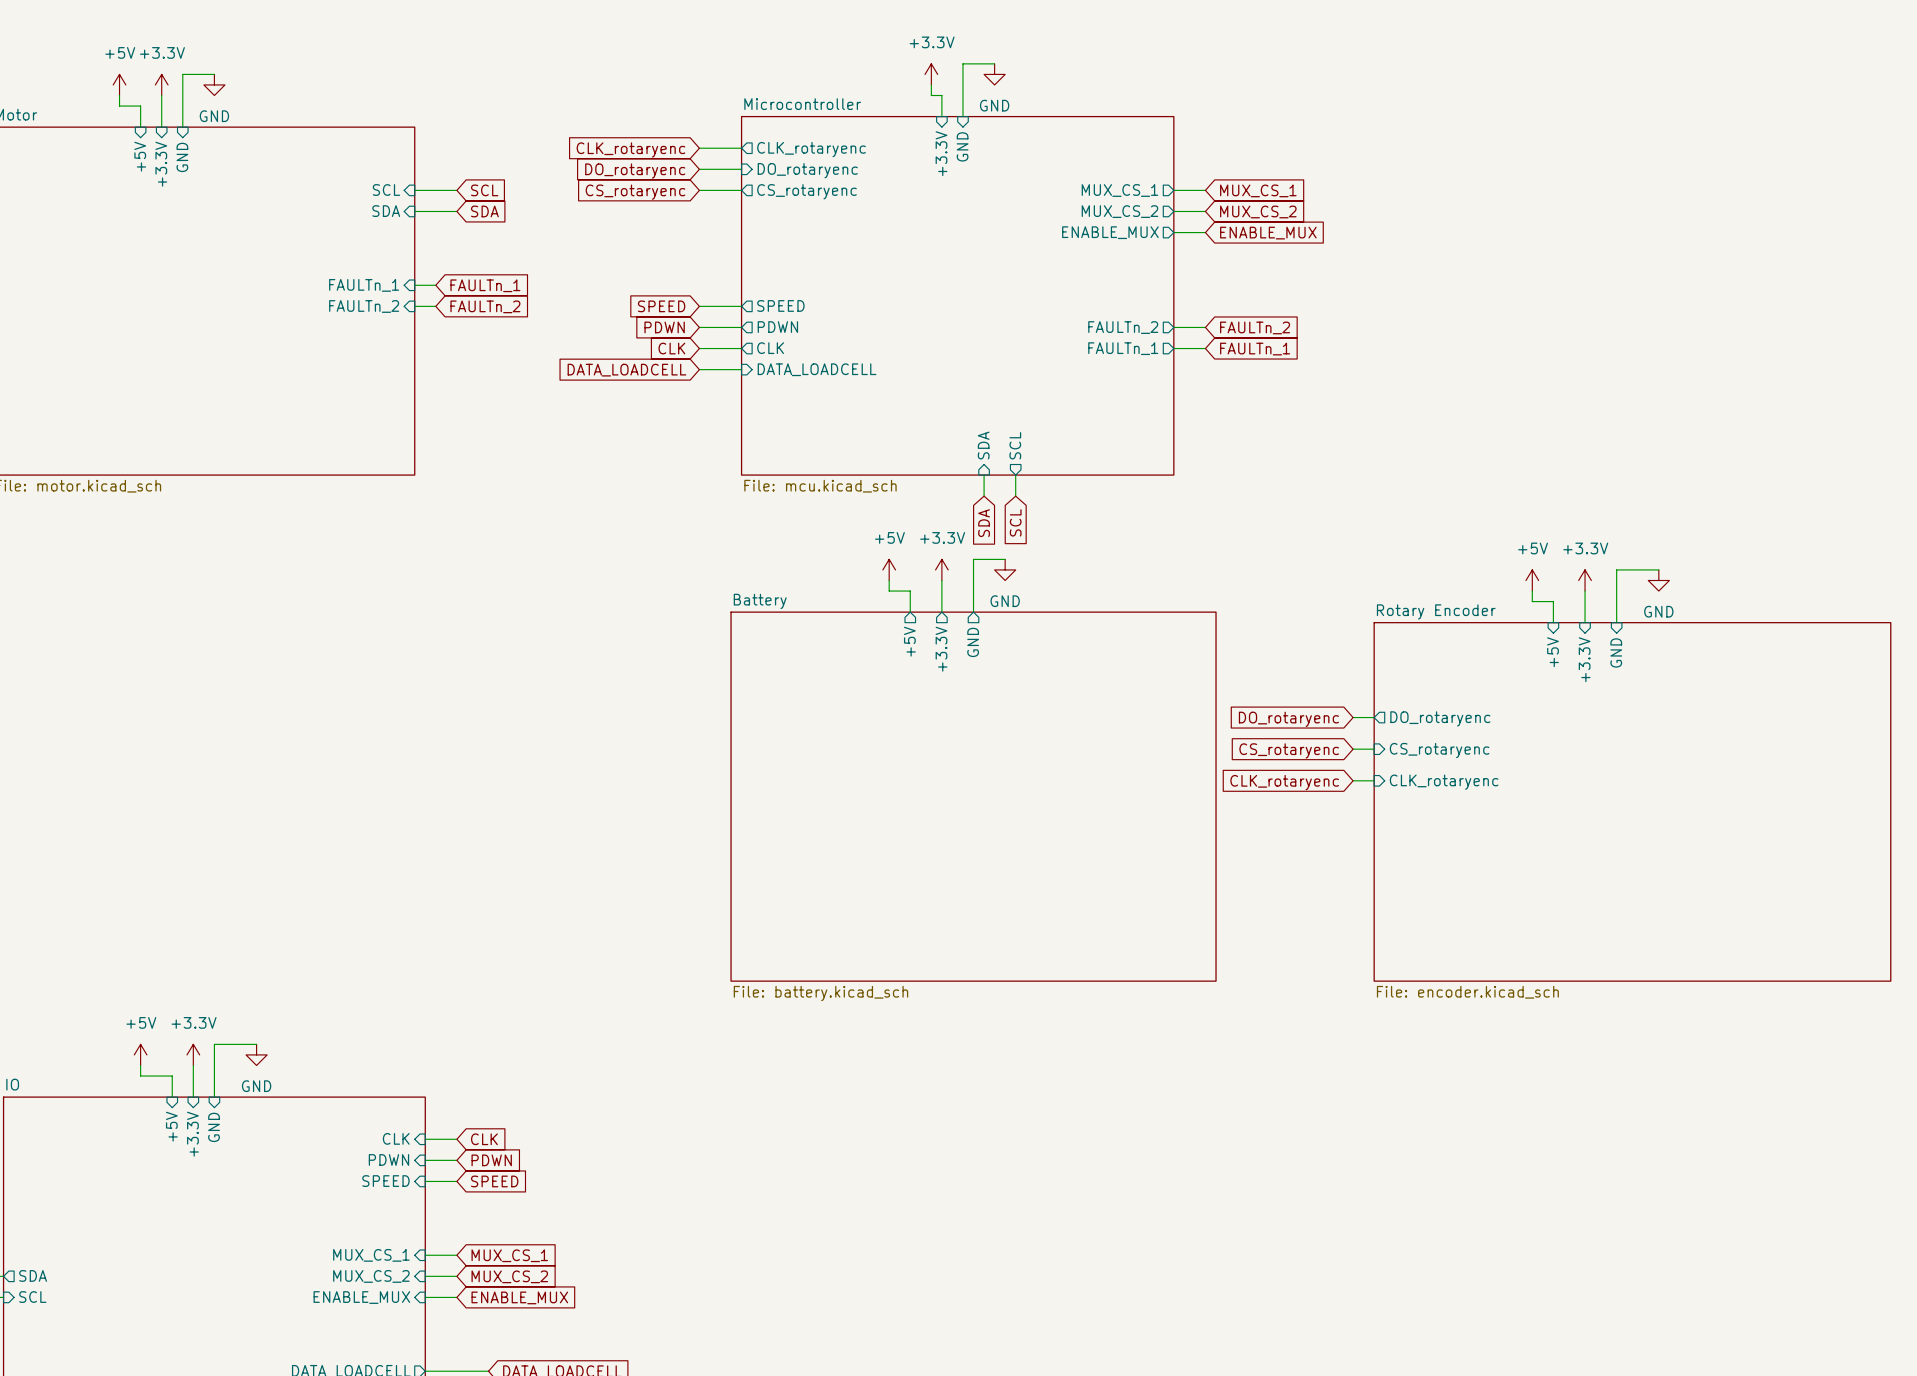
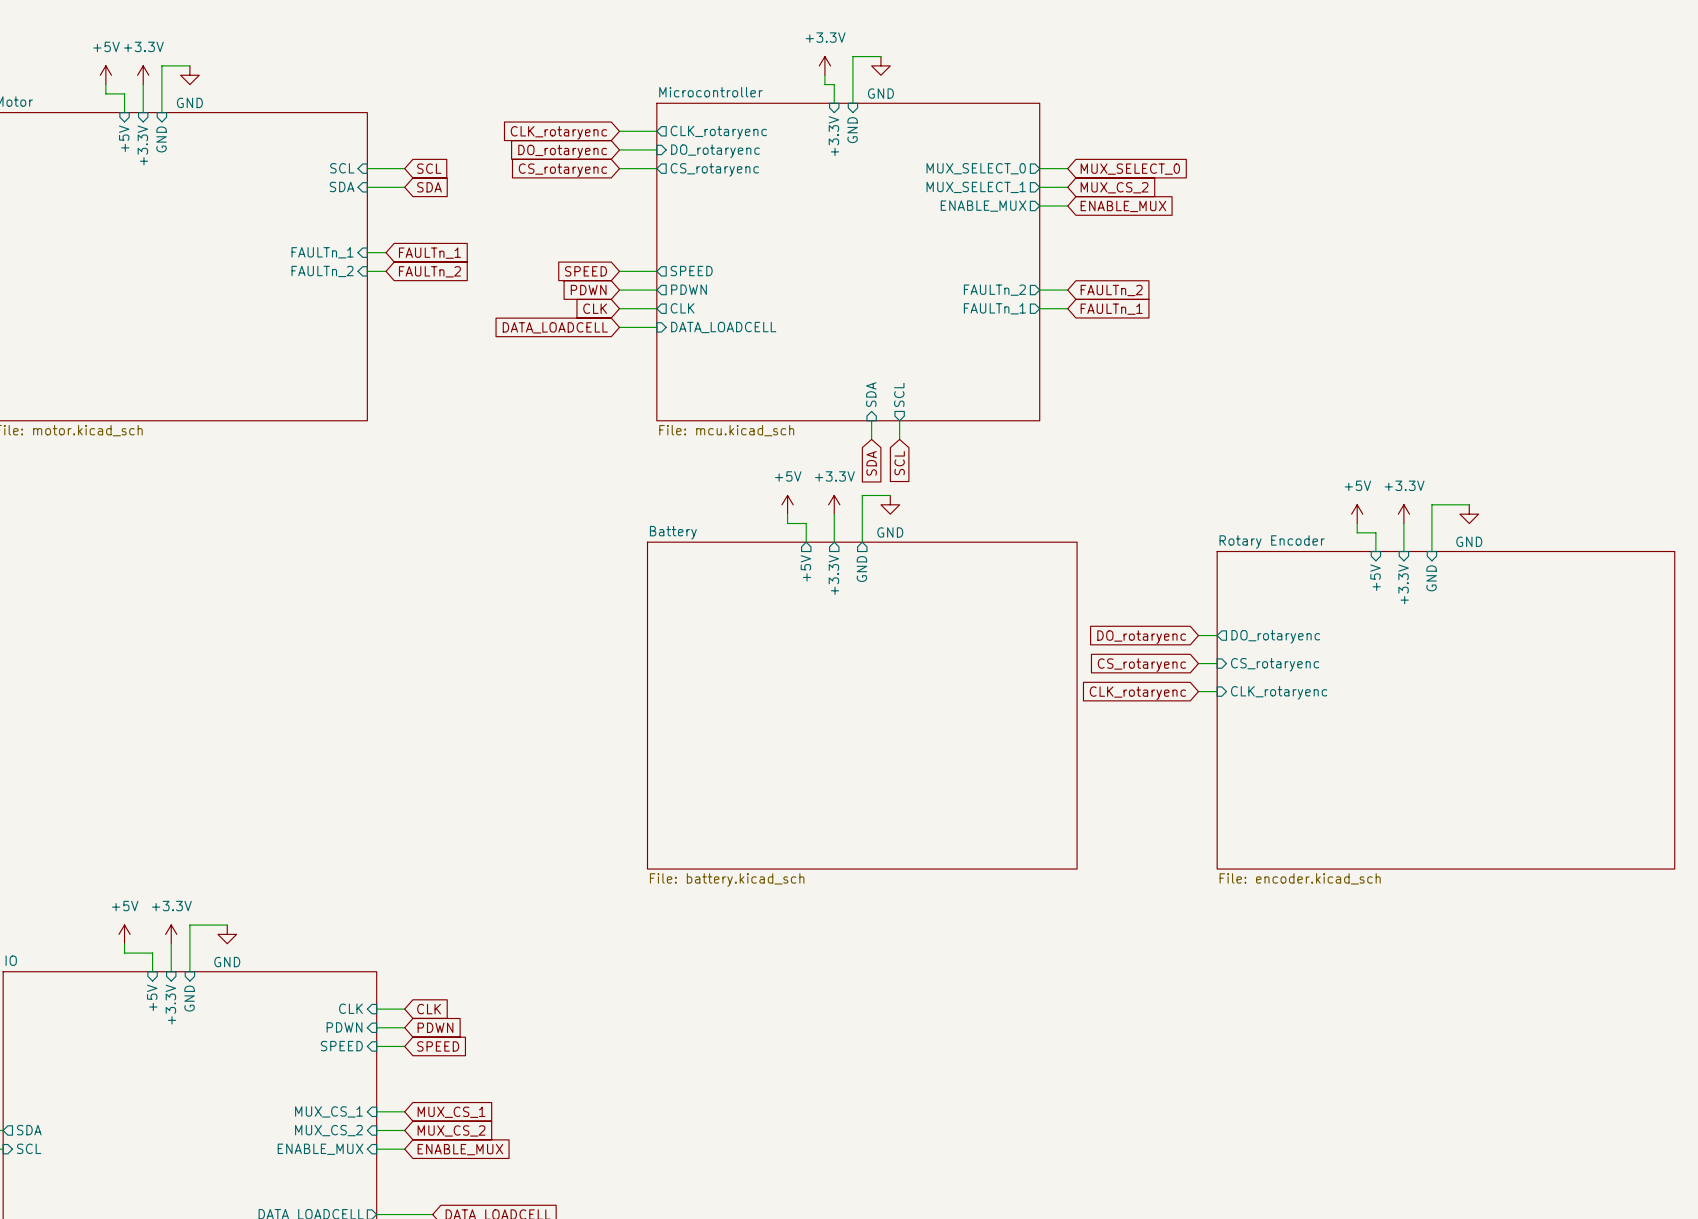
sheet pin: MUX_CS_1 (1119, 190) -> MUX_SELECT_0 (976, 168)
global label: MUX_CS_1 (1258, 190) -> MUX_SELECT_0 (1130, 169)
sheet pin: MUX_CS_2 (1119, 211) -> MUX_SELECT_1 (976, 187)

